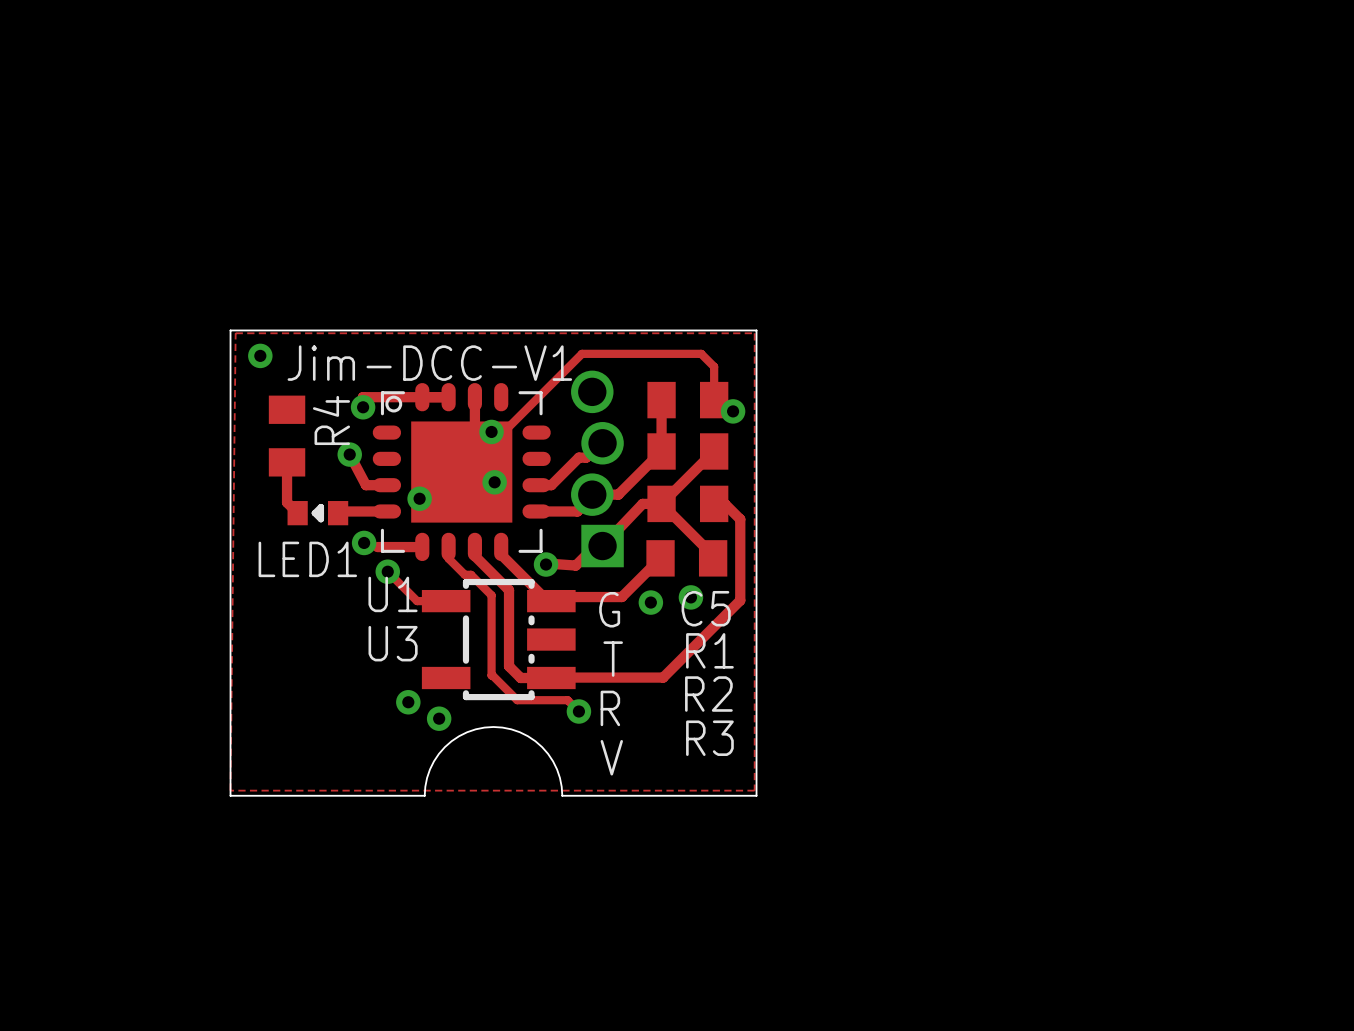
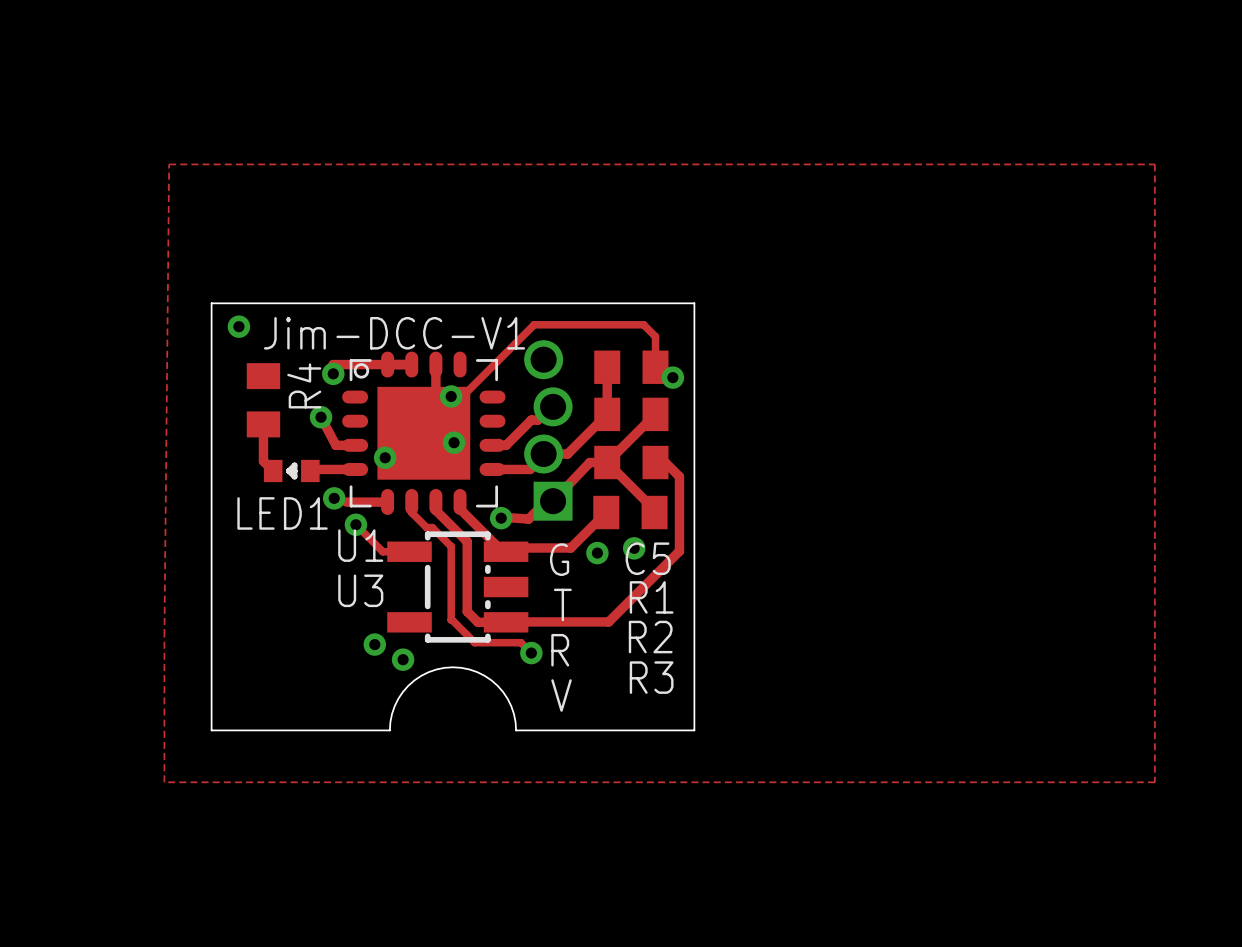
zone outline: none -> (169, 164) (1154, 164) (1154, 782) (164, 782) (169, 164)
zone outline: (235, 333) (754, 333) (754, 790) (230, 790) (235, 333) -> none

